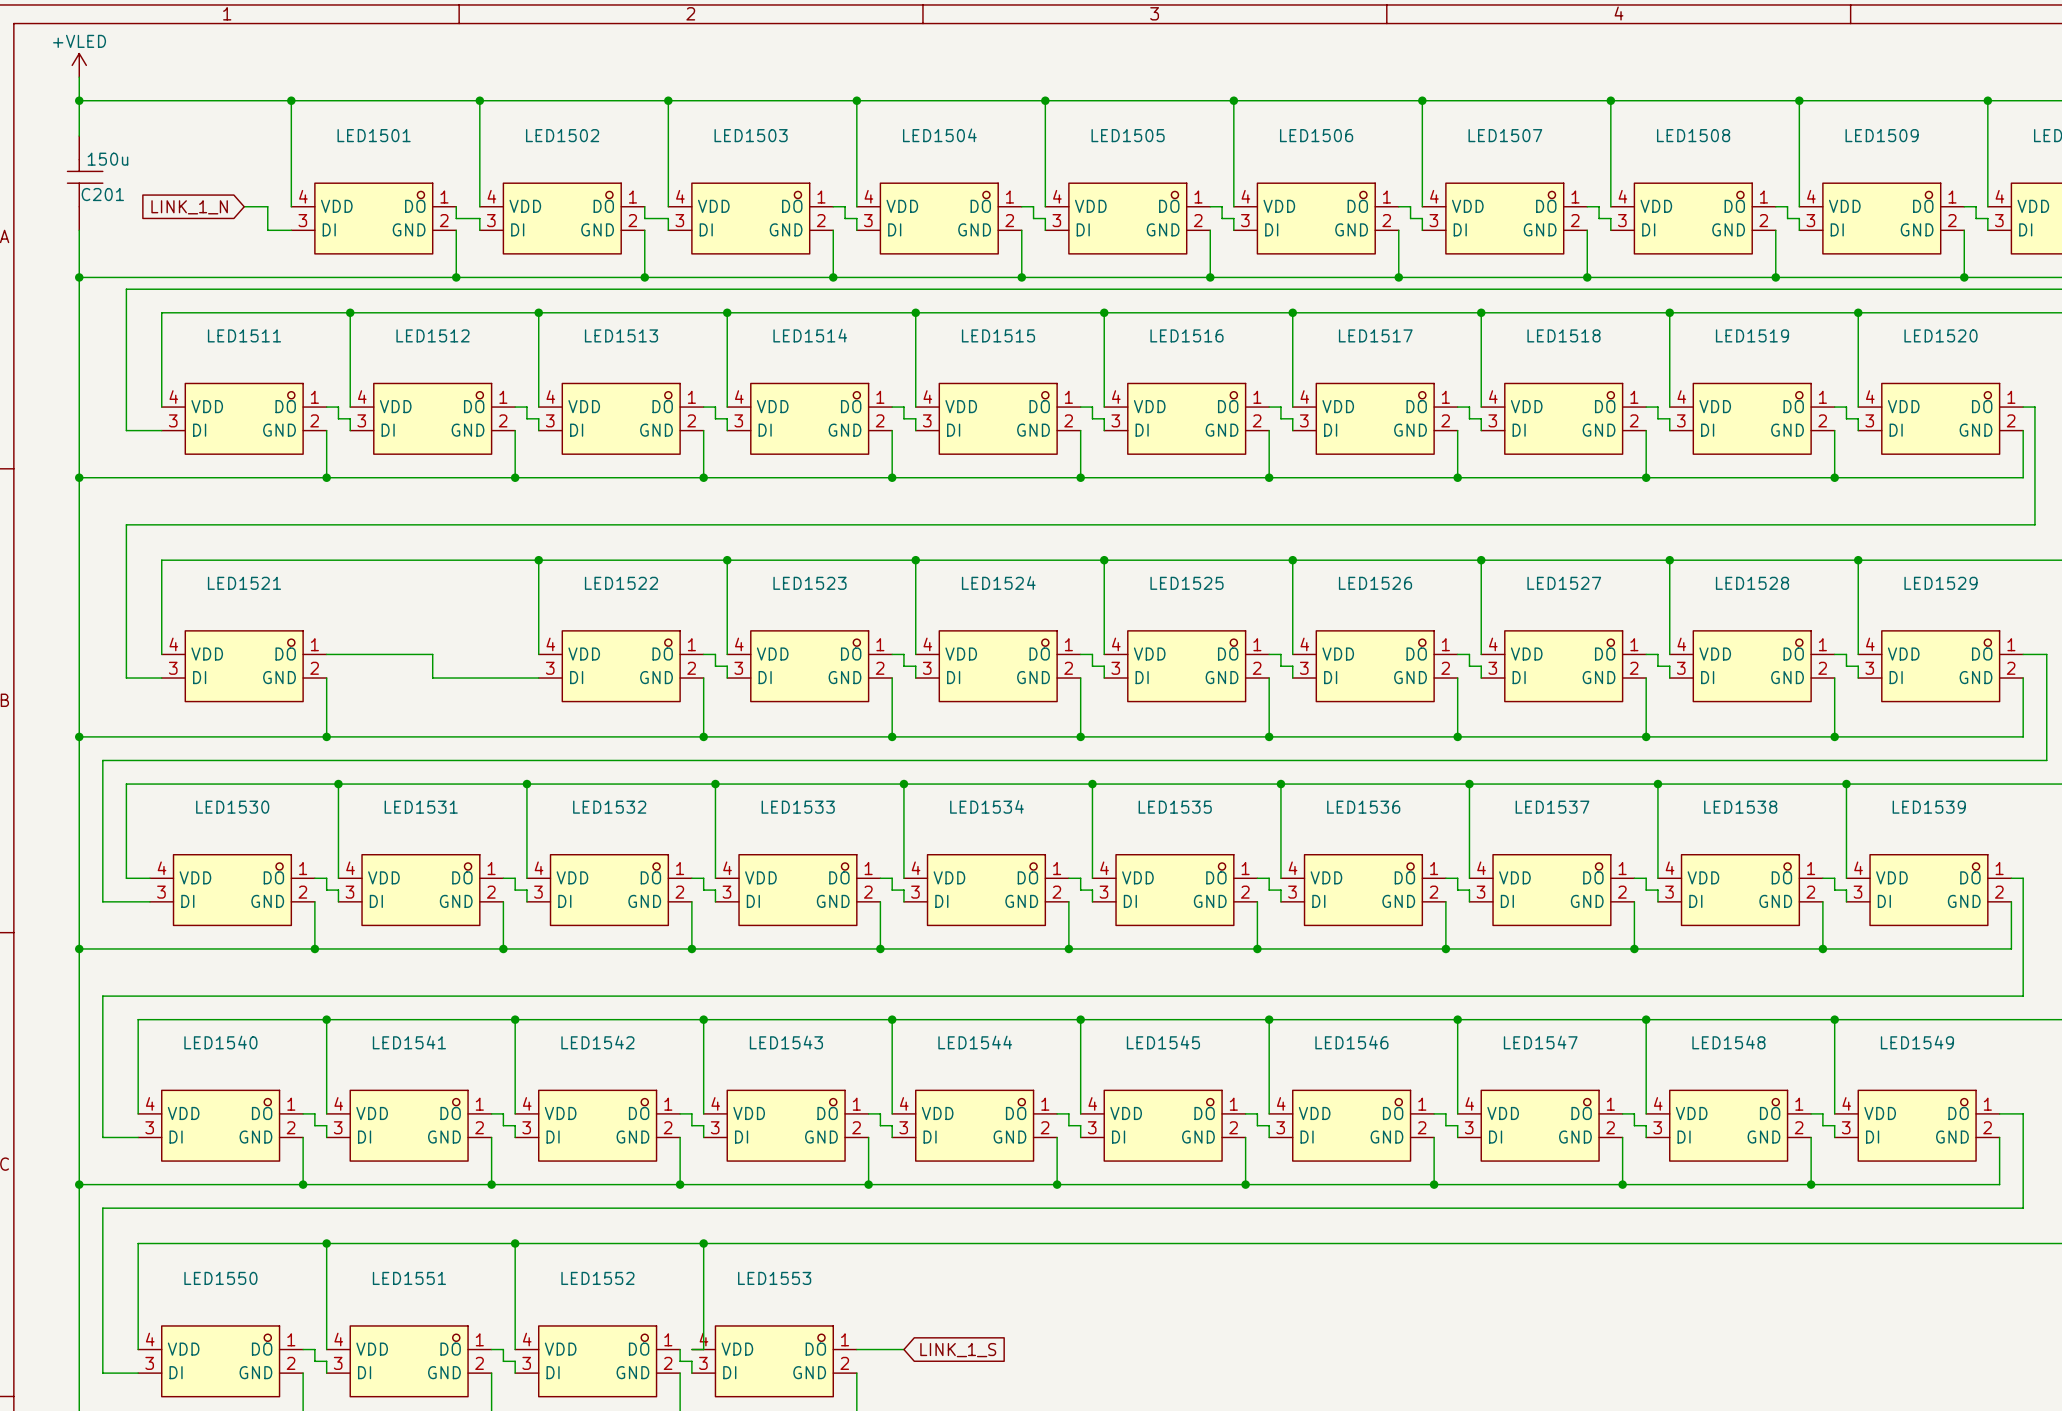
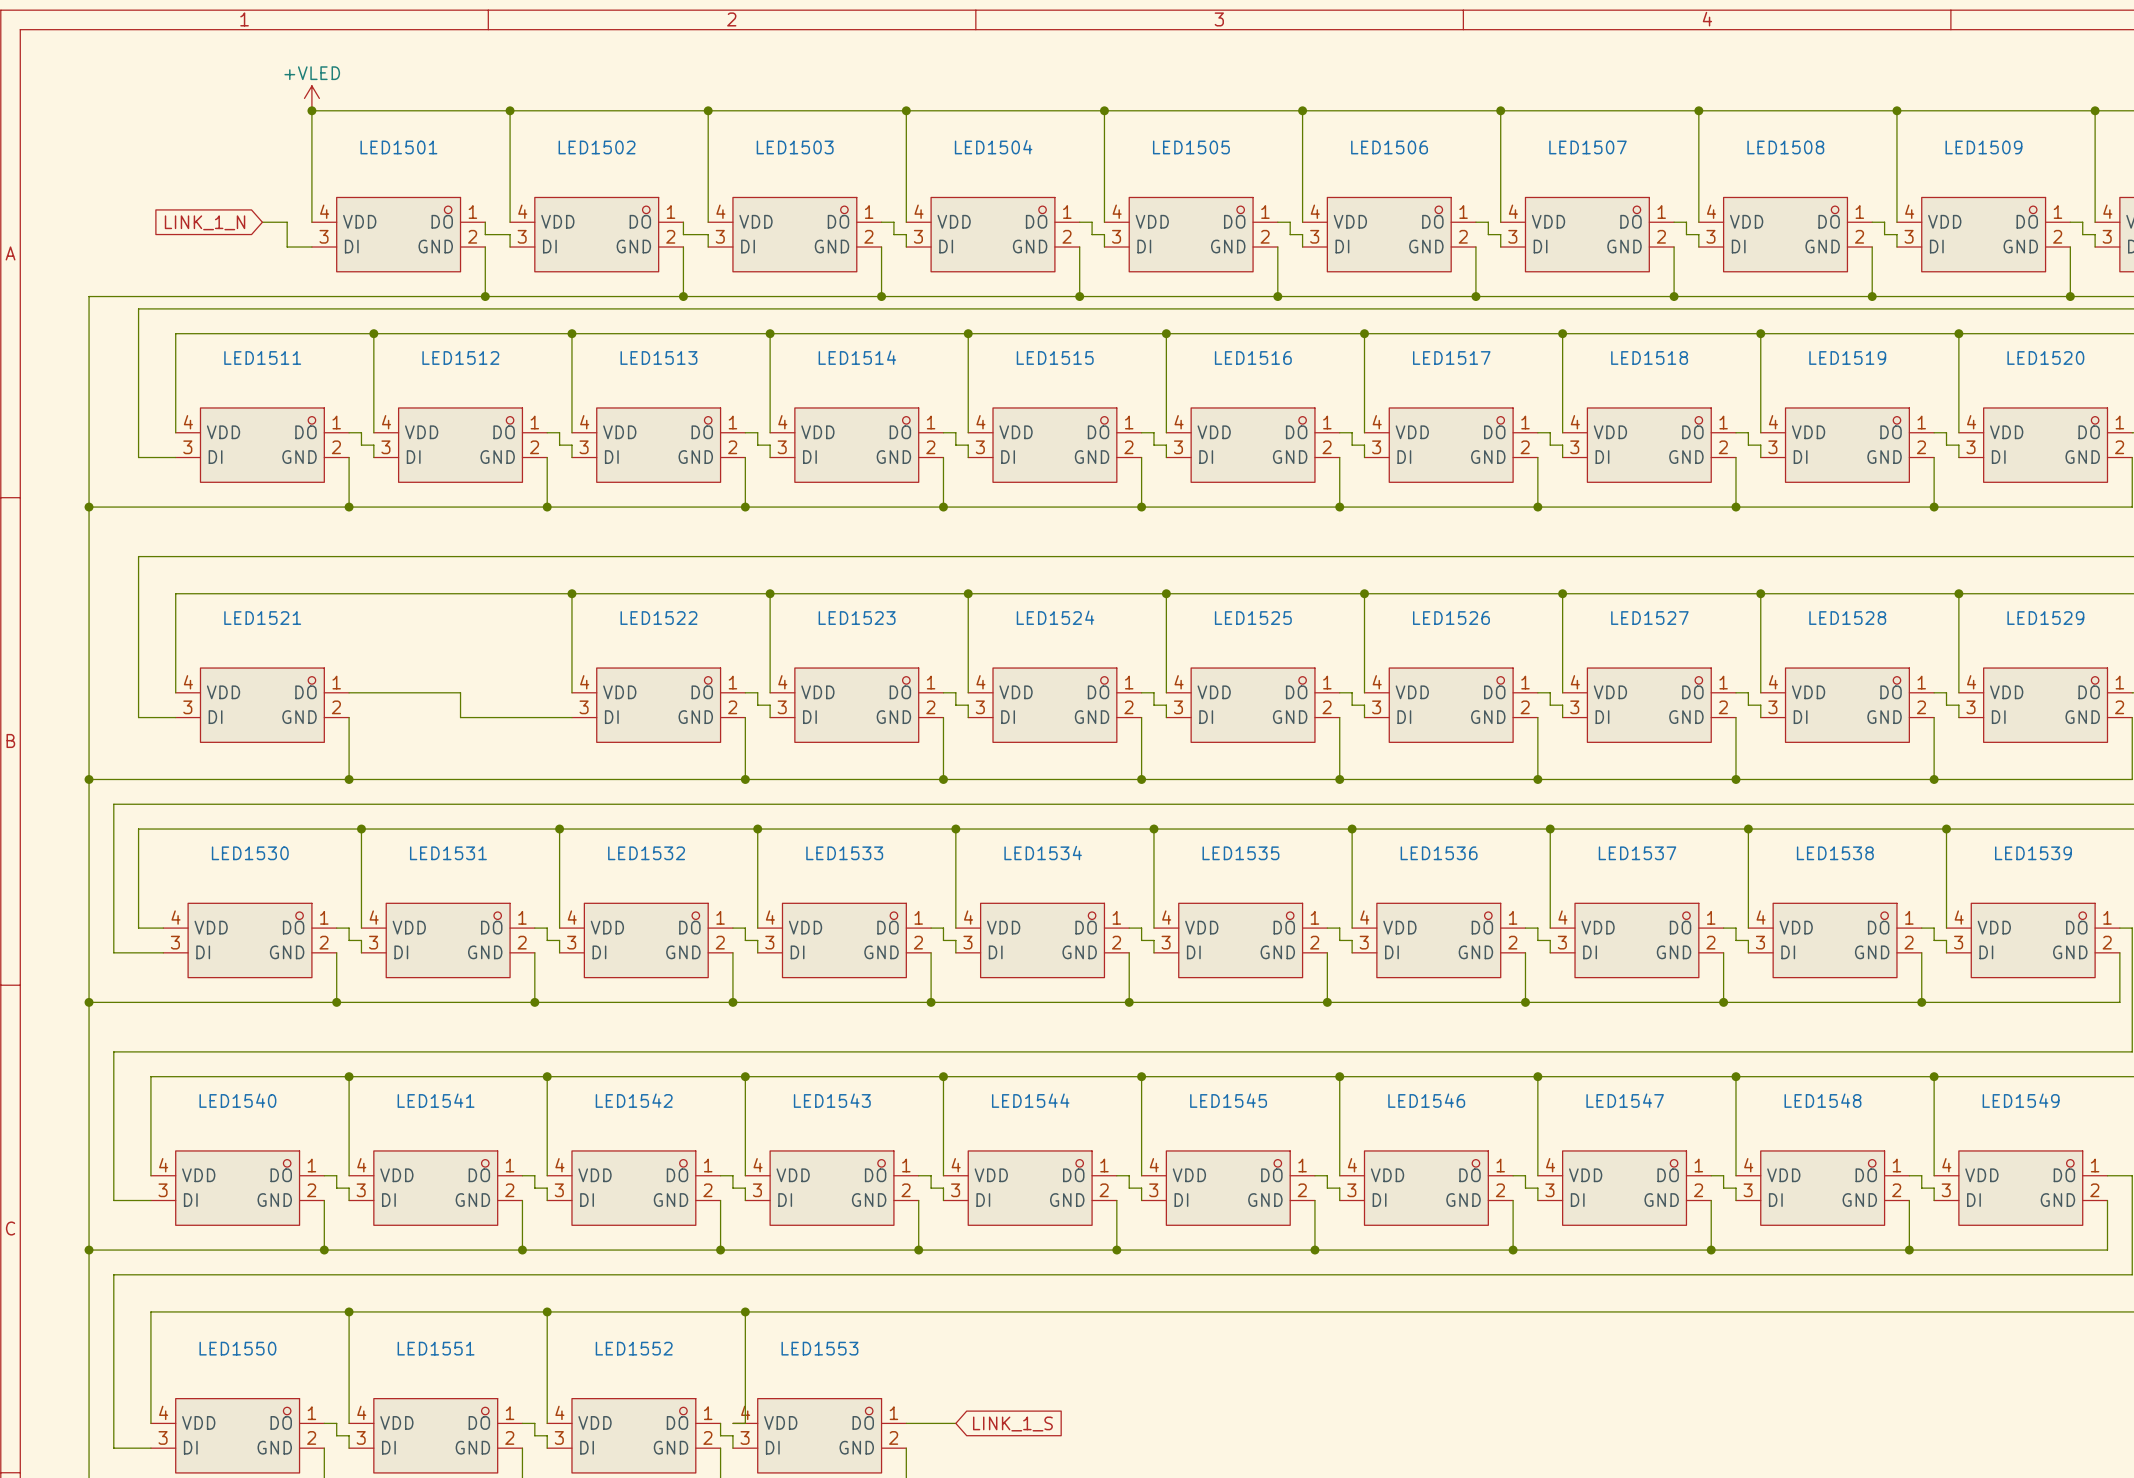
power symbol position: +VLED (79, 65) -> +VLED (311, 98)
wire: (79, 77) (79, 136) -> none
wire: (79, 100) (291, 100) -> none
junction: (79, 100) -> none
C201: 150u (85, 183) -> none
wire: (79, 230) (79, 277) -> none
junction: (79, 277) -> none

